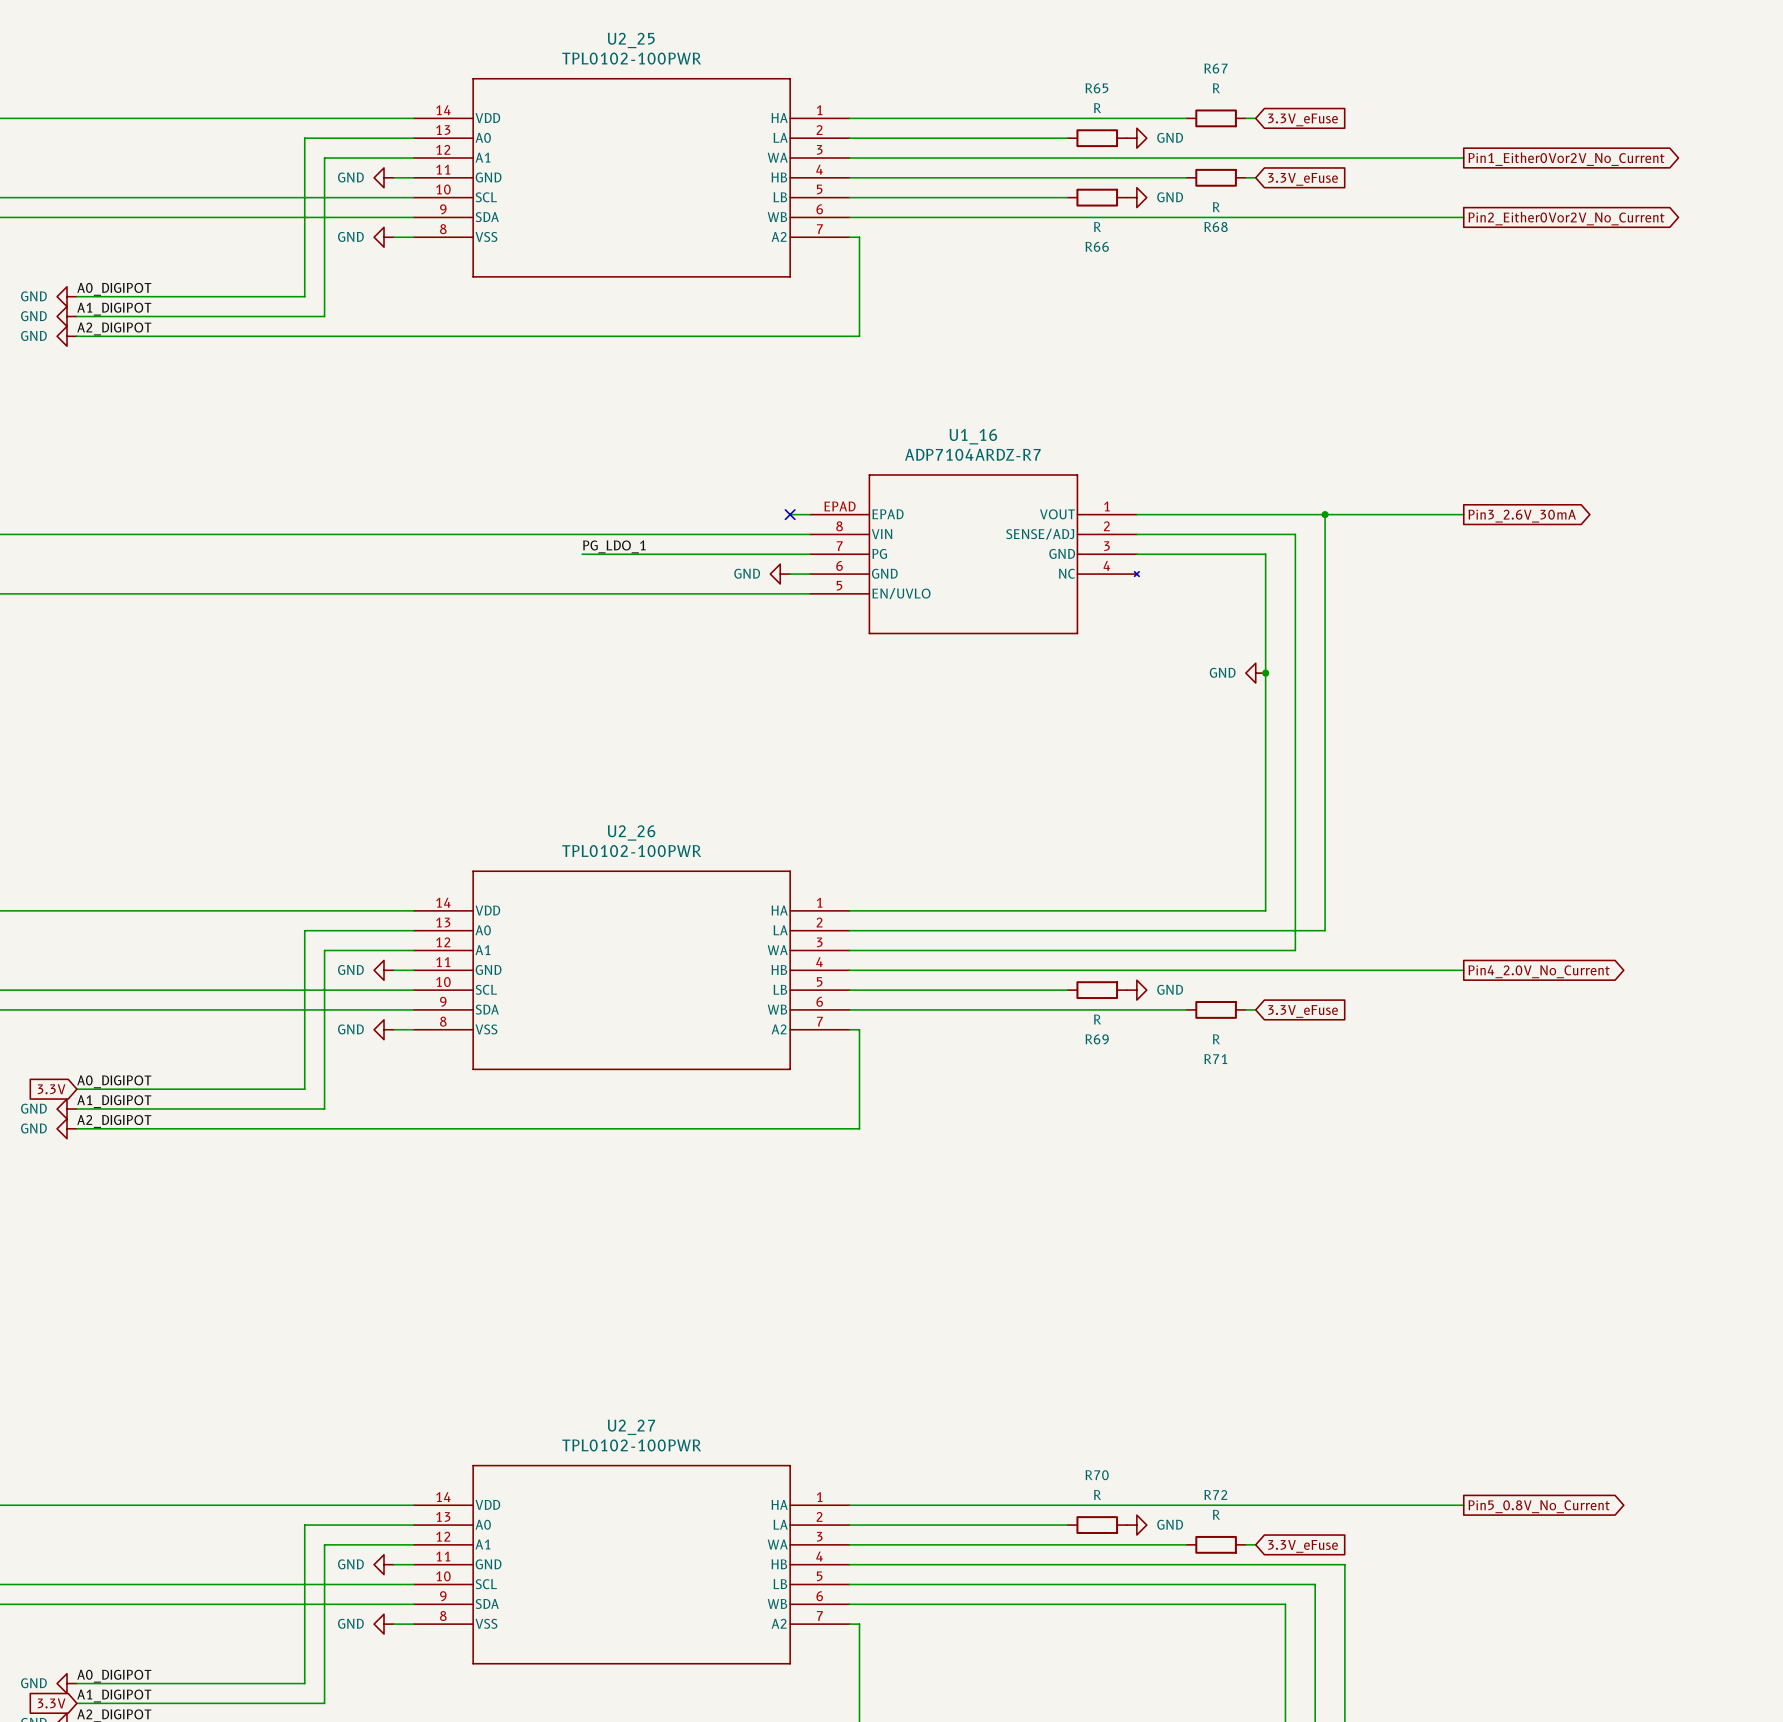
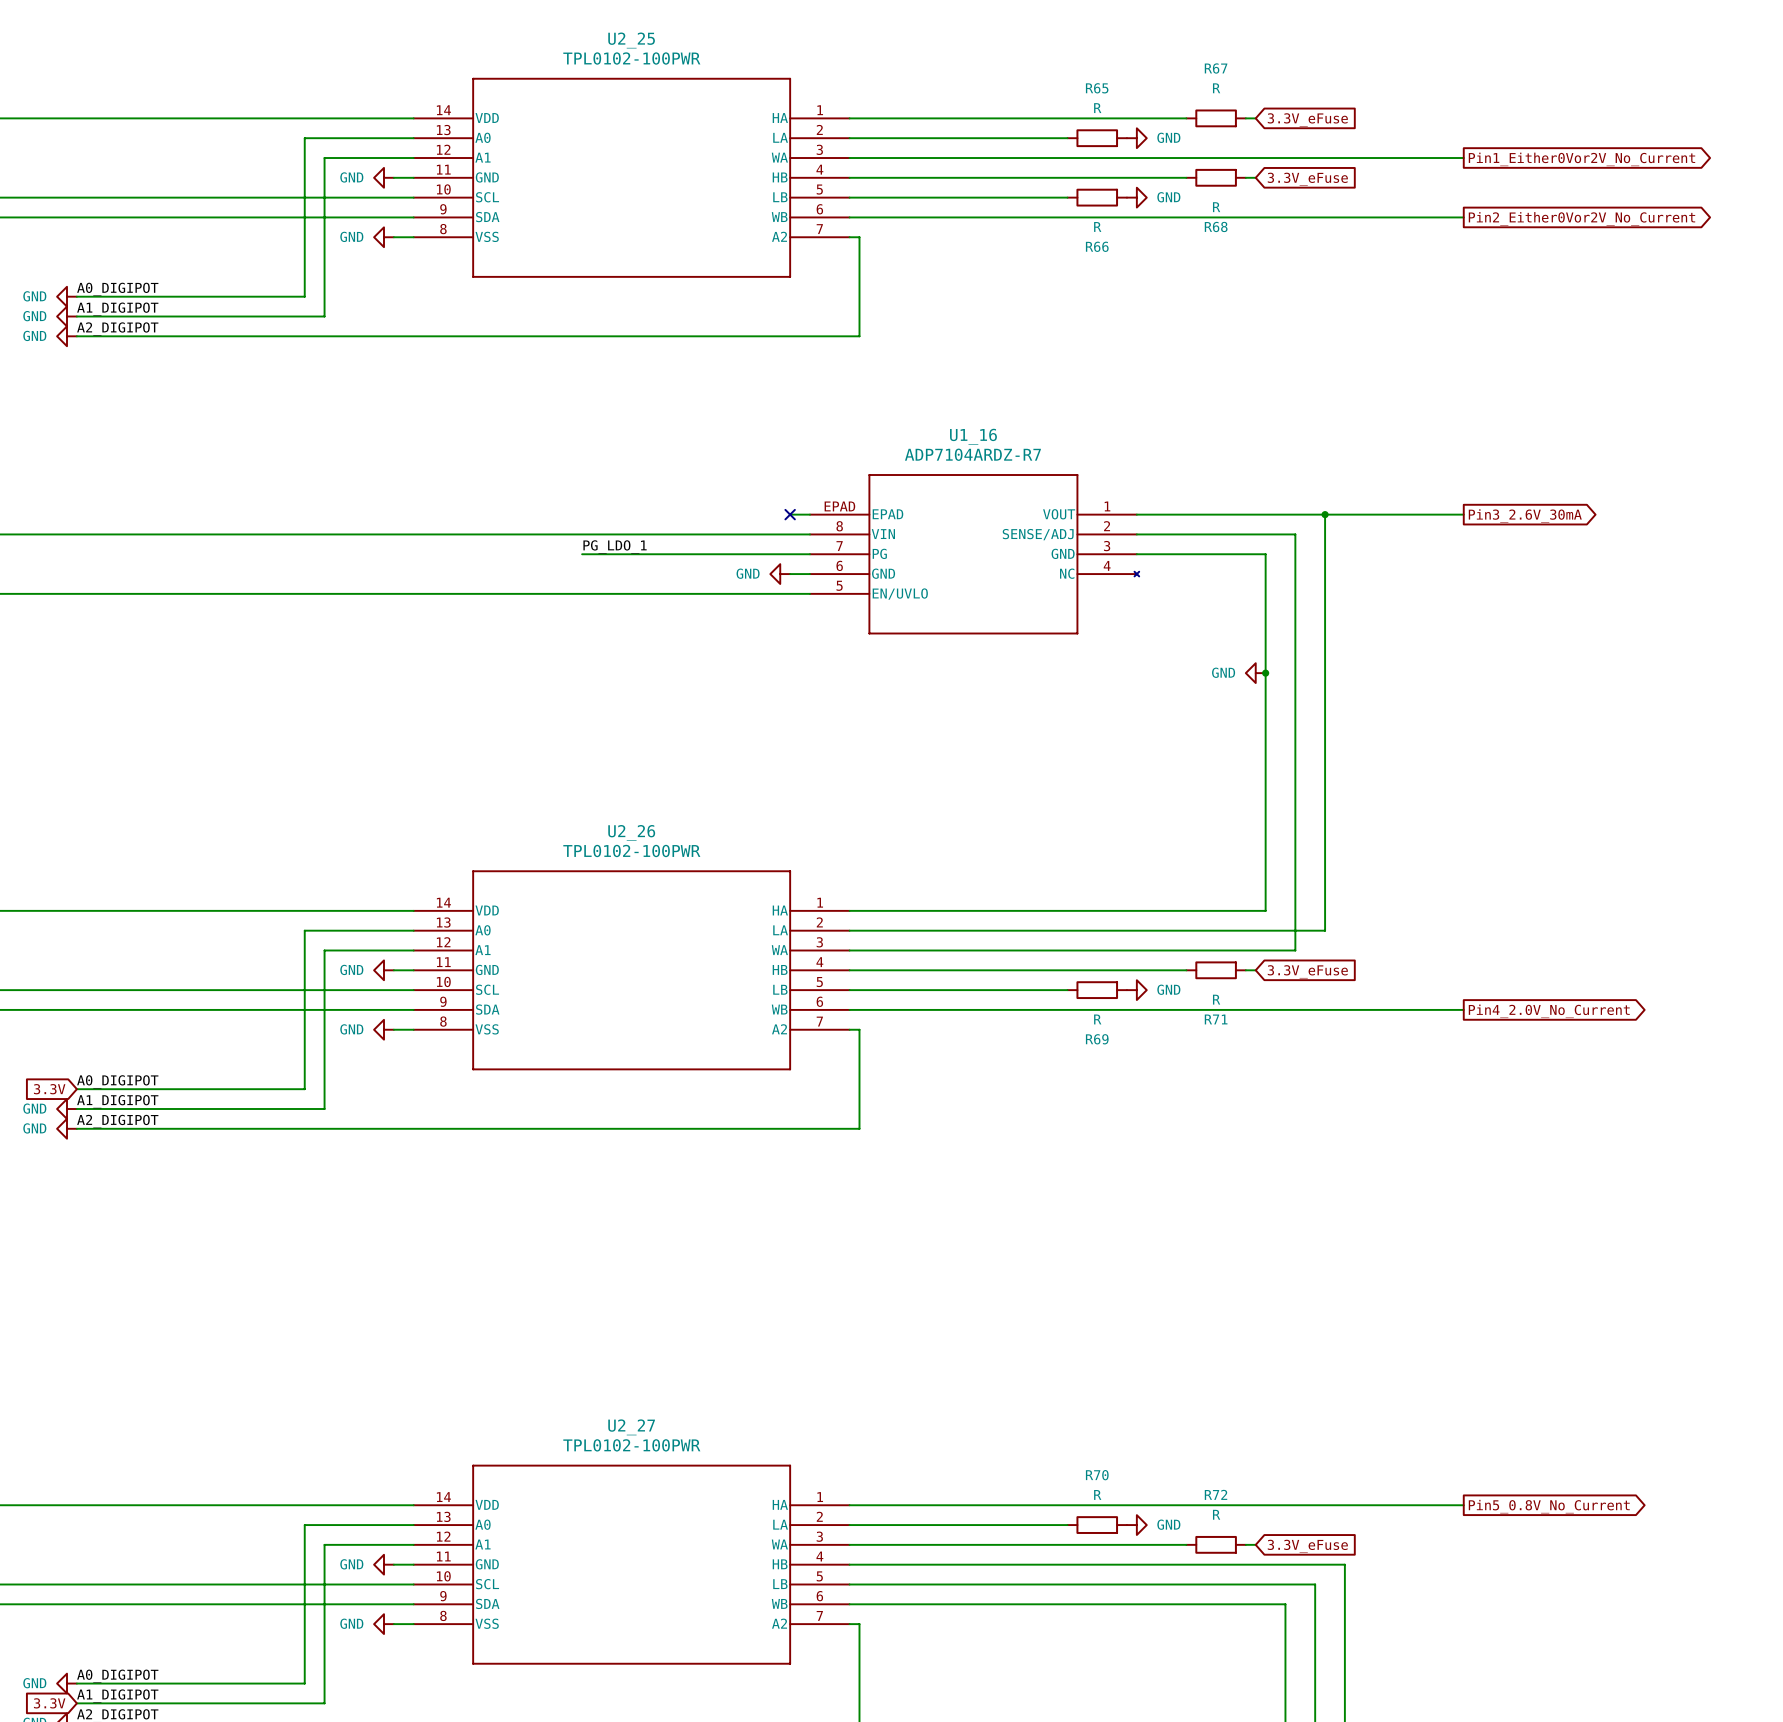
wire: (1186, 970) (1245, 970) -> (1186, 1009) (1245, 1009)
wire: (1255, 970) (1463, 970) -> (1255, 1009) (1463, 1009)
global label position: Pin4_2.0V_No_Current (1539, 971) -> Pin4_2.0V_No_Current (1549, 1011)
R71 position: (1216, 1009) -> (1216, 970)
global label position: 3.3V_eFuse (1303, 1011) -> 3.3V_eFuse (1307, 971)

